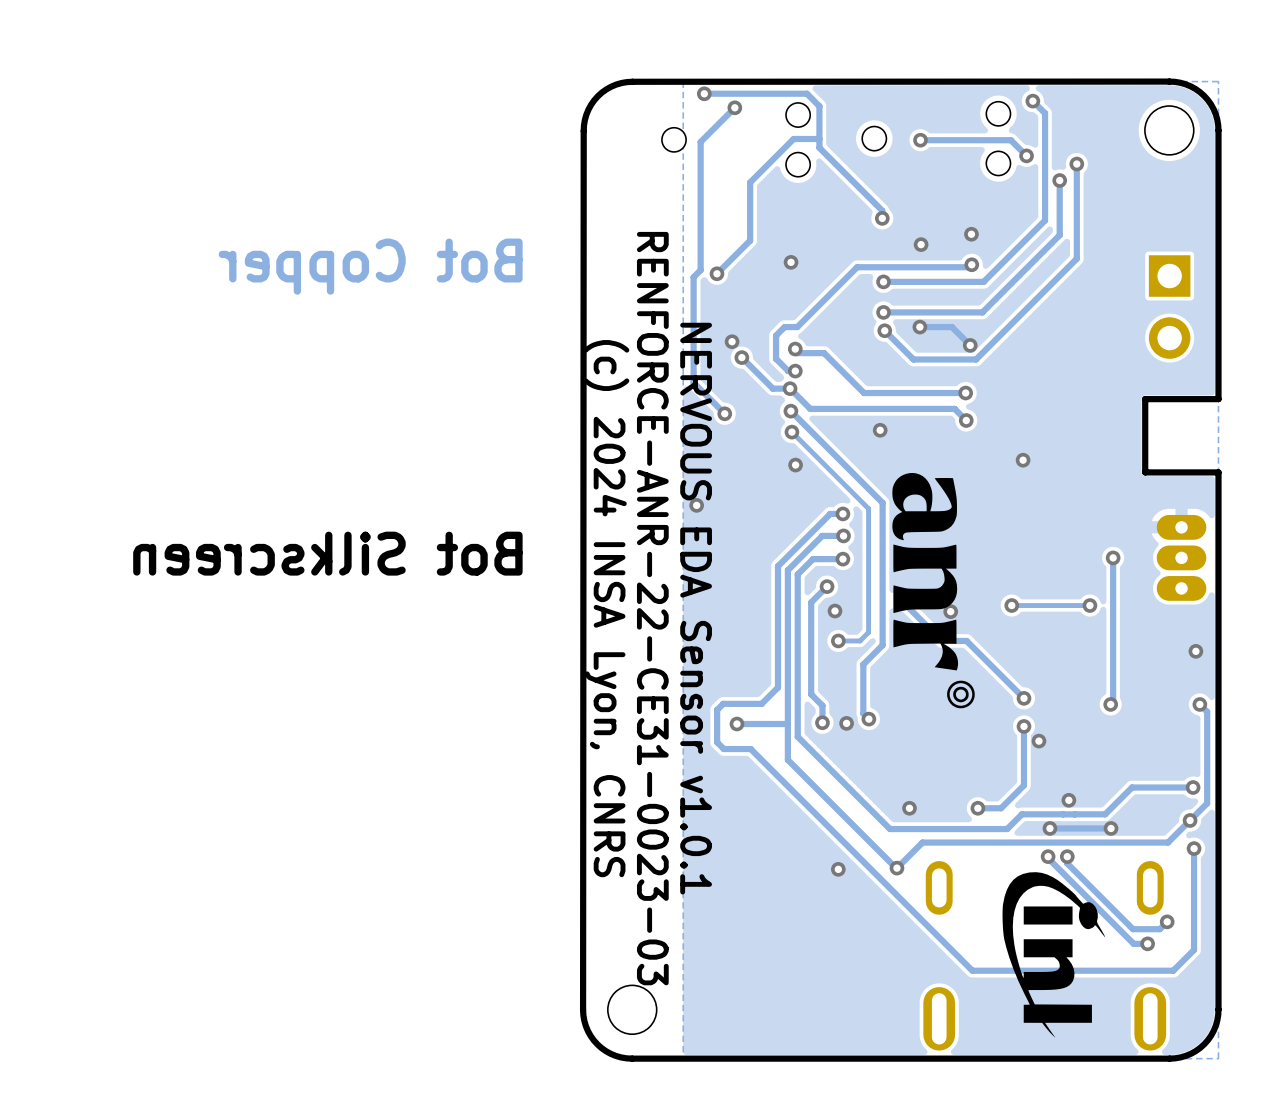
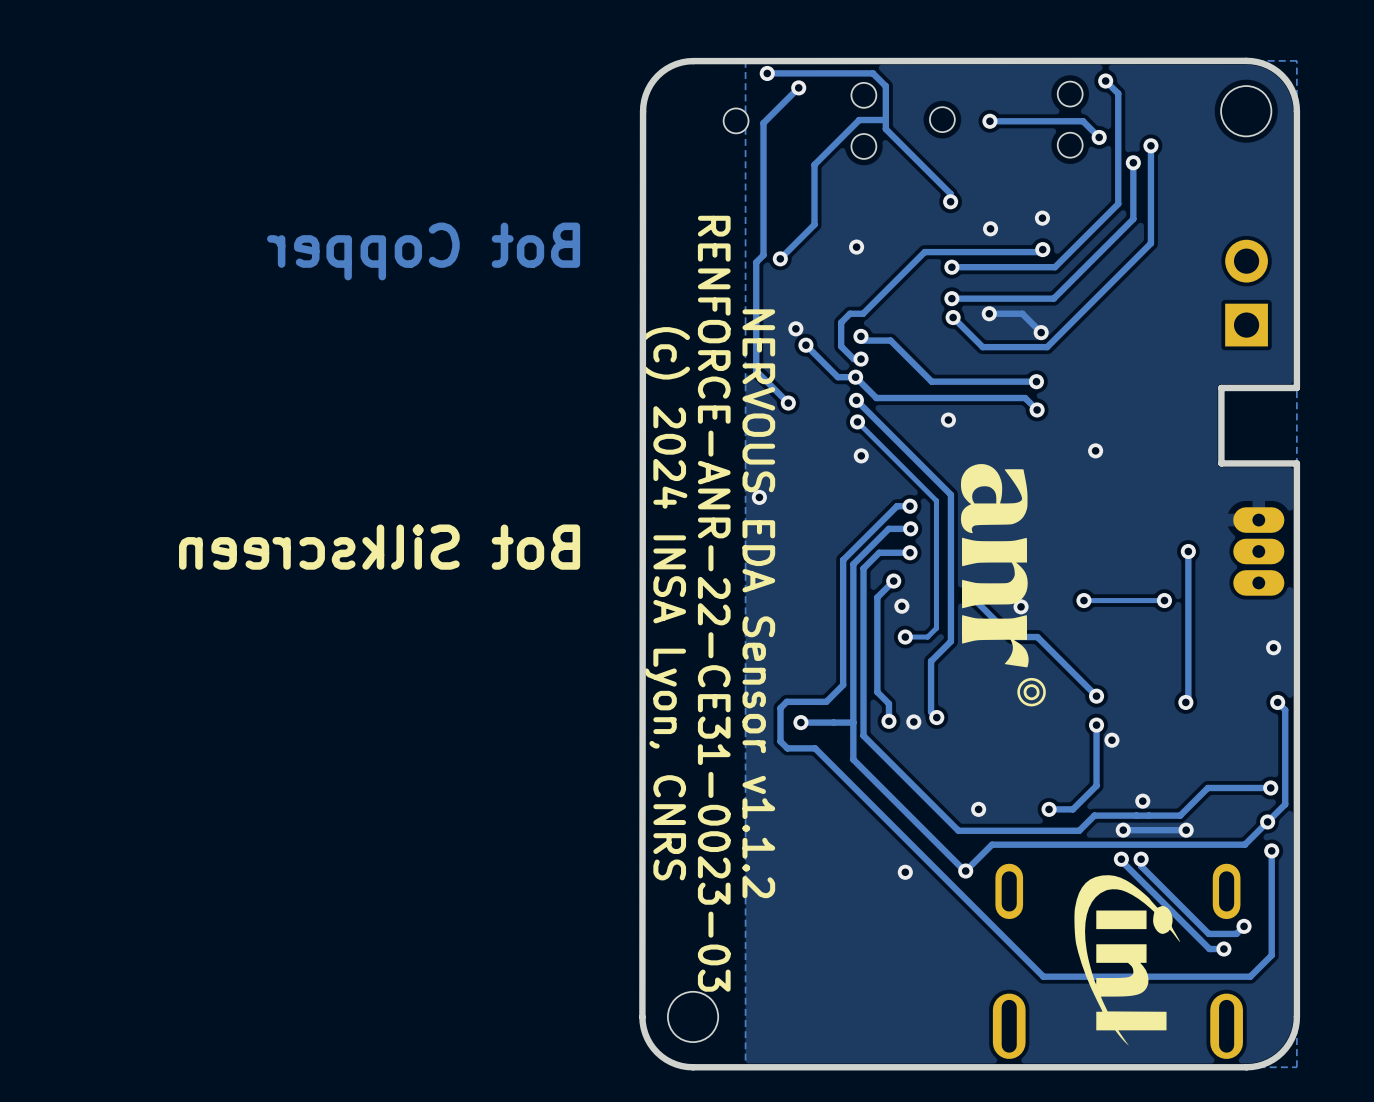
part rotation: 0° (1169, 307) -> 180° (1246, 293)
text: NERVOUS EDA Sensor v1.0.1 (696, 608) -> NERVOUS EDA Sensor v1.1.2 (758, 603)

